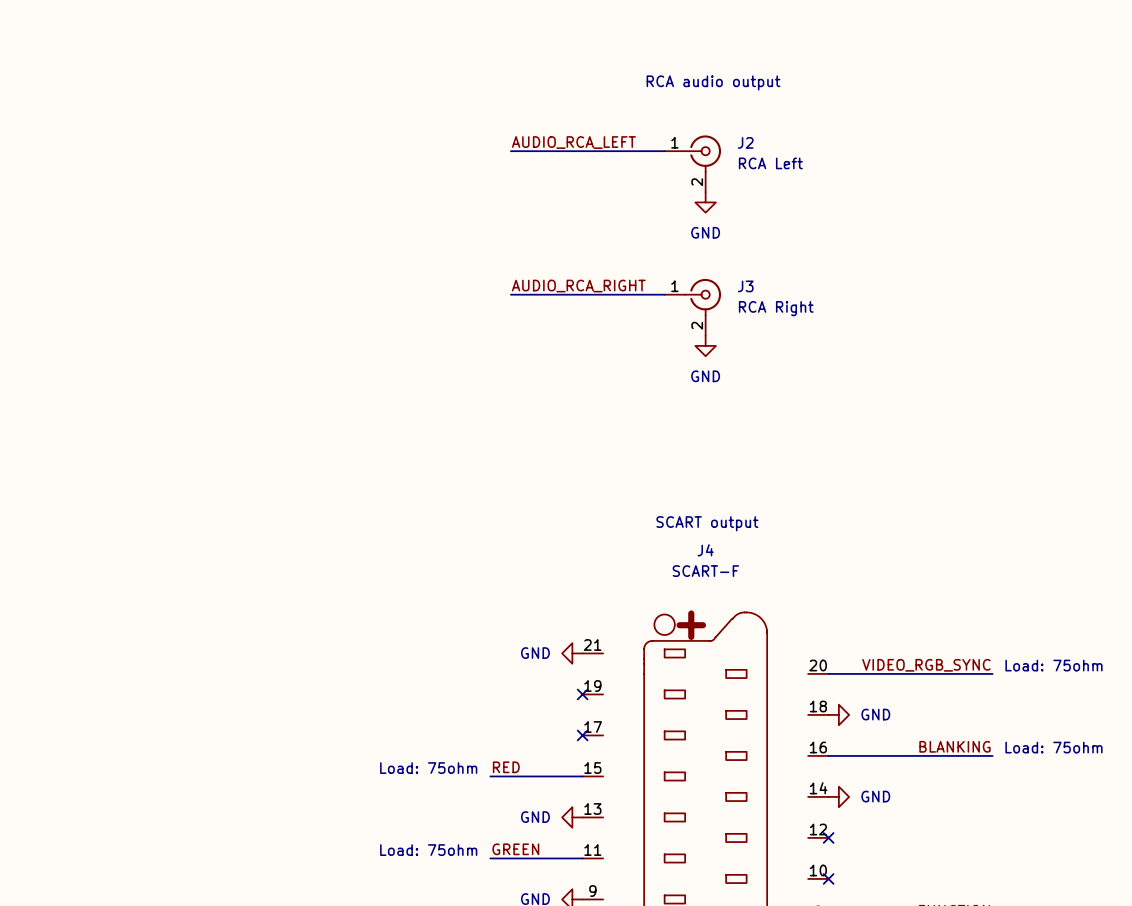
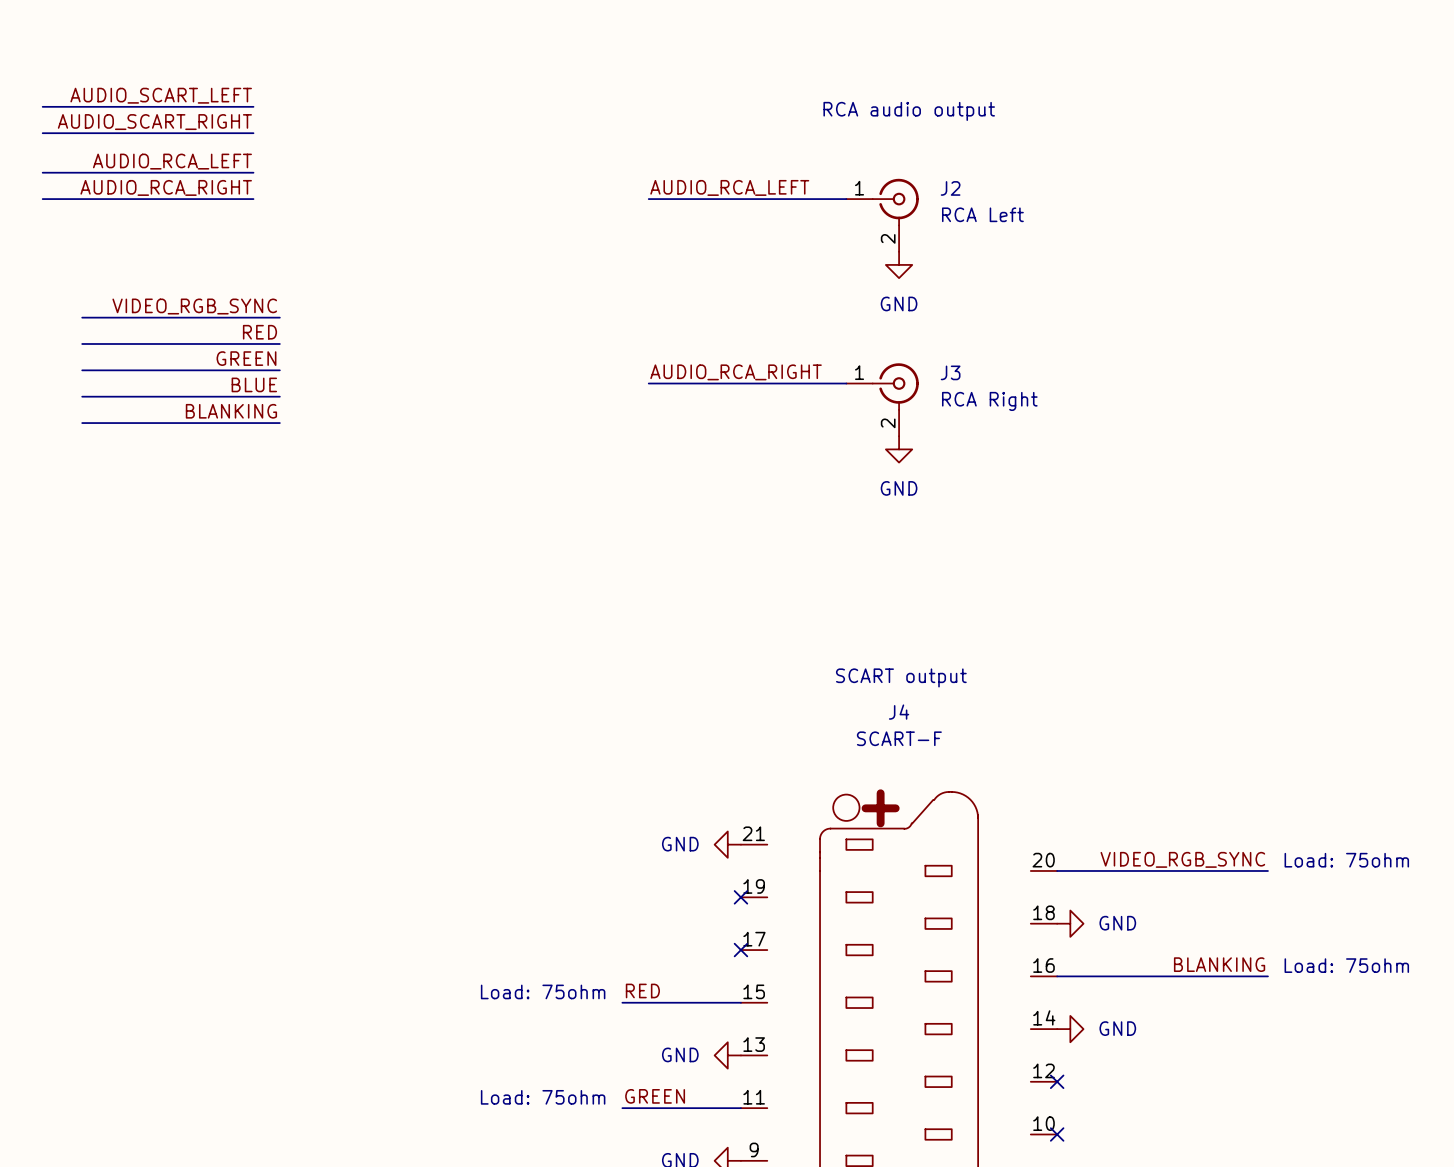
label: none -> AUDIO_SCART_LEFT (161, 95)
wire: none -> (42, 106) (253, 106)
label: none -> AUDIO_SCART_RIGHT (154, 122)
wire: none -> (42, 133) (253, 133)
label: none -> AUDIO_RCA_LEFT (172, 161)
wire: none -> (42, 172) (253, 172)
label: none -> AUDIO_RCA_RIGHT (166, 187)
wire: none -> (42, 199) (253, 199)
label: none -> VIDEO_RGB_SYNC (194, 306)
wire: none -> (82, 317) (279, 317)
label: none -> RED (259, 332)
wire: none -> (82, 343) (279, 343)
label: none -> GREEN (246, 358)
wire: none -> (82, 370) (279, 370)
label: none -> BLUE (254, 384)
wire: none -> (82, 396) (279, 396)
label: none -> BLANKING (231, 411)
wire: none -> (82, 423) (279, 423)

